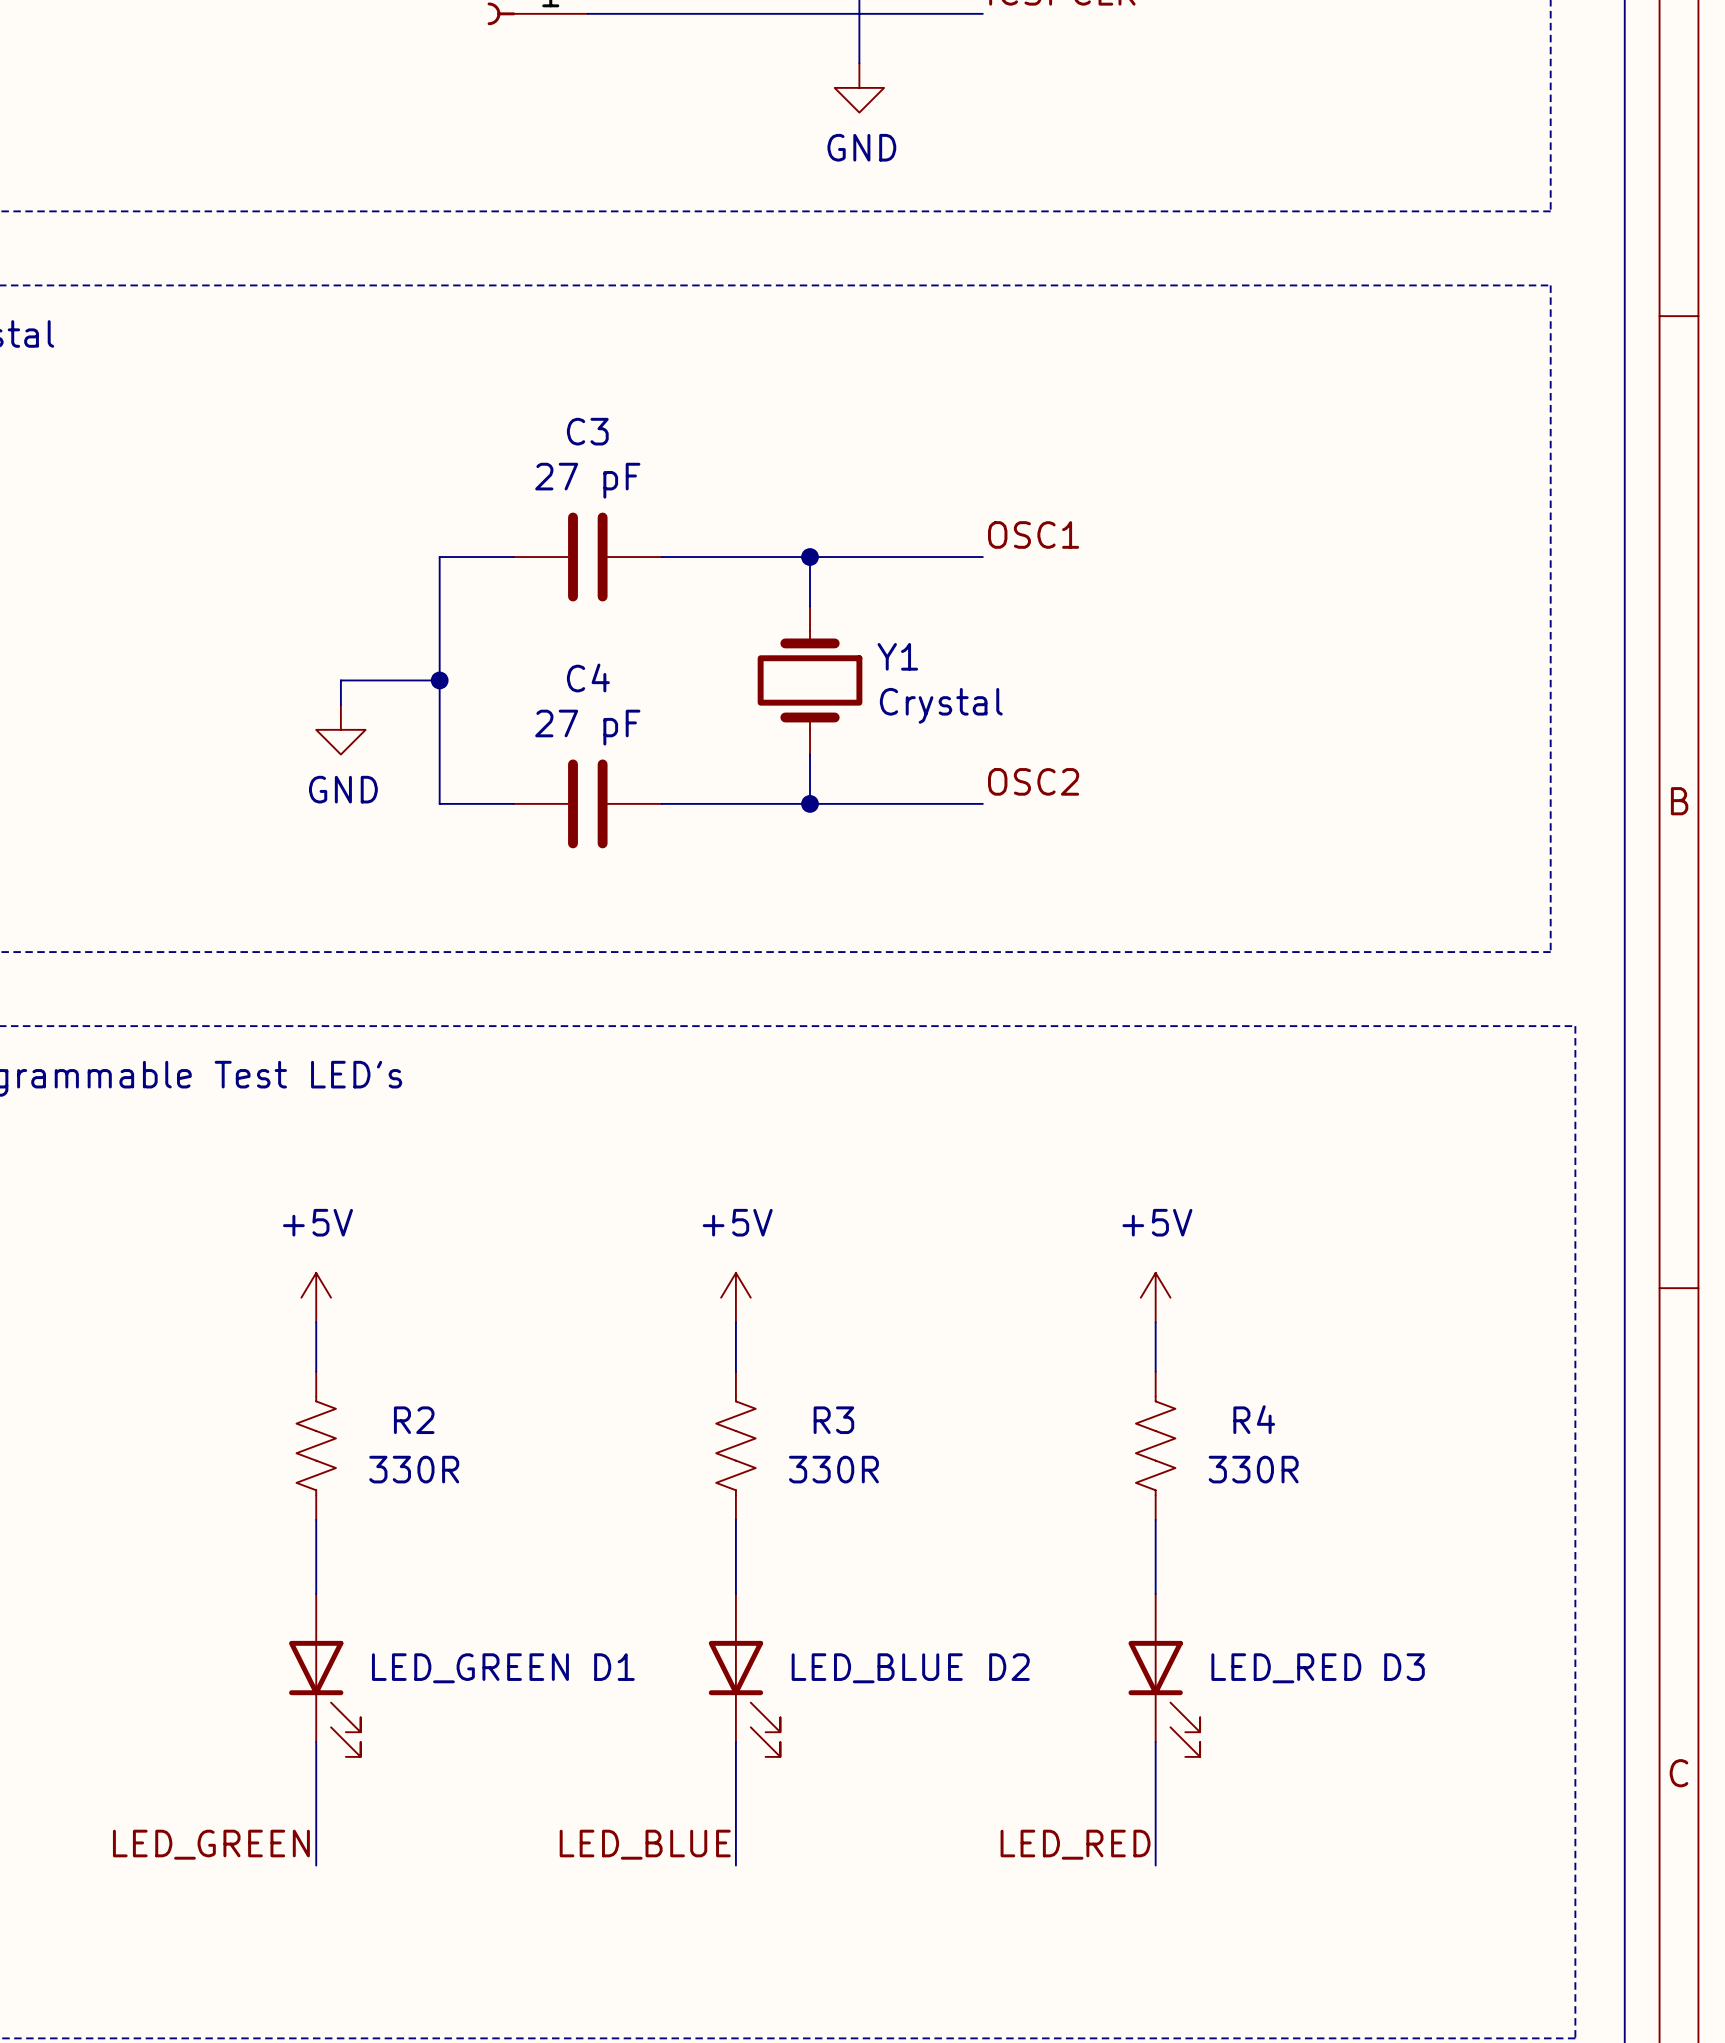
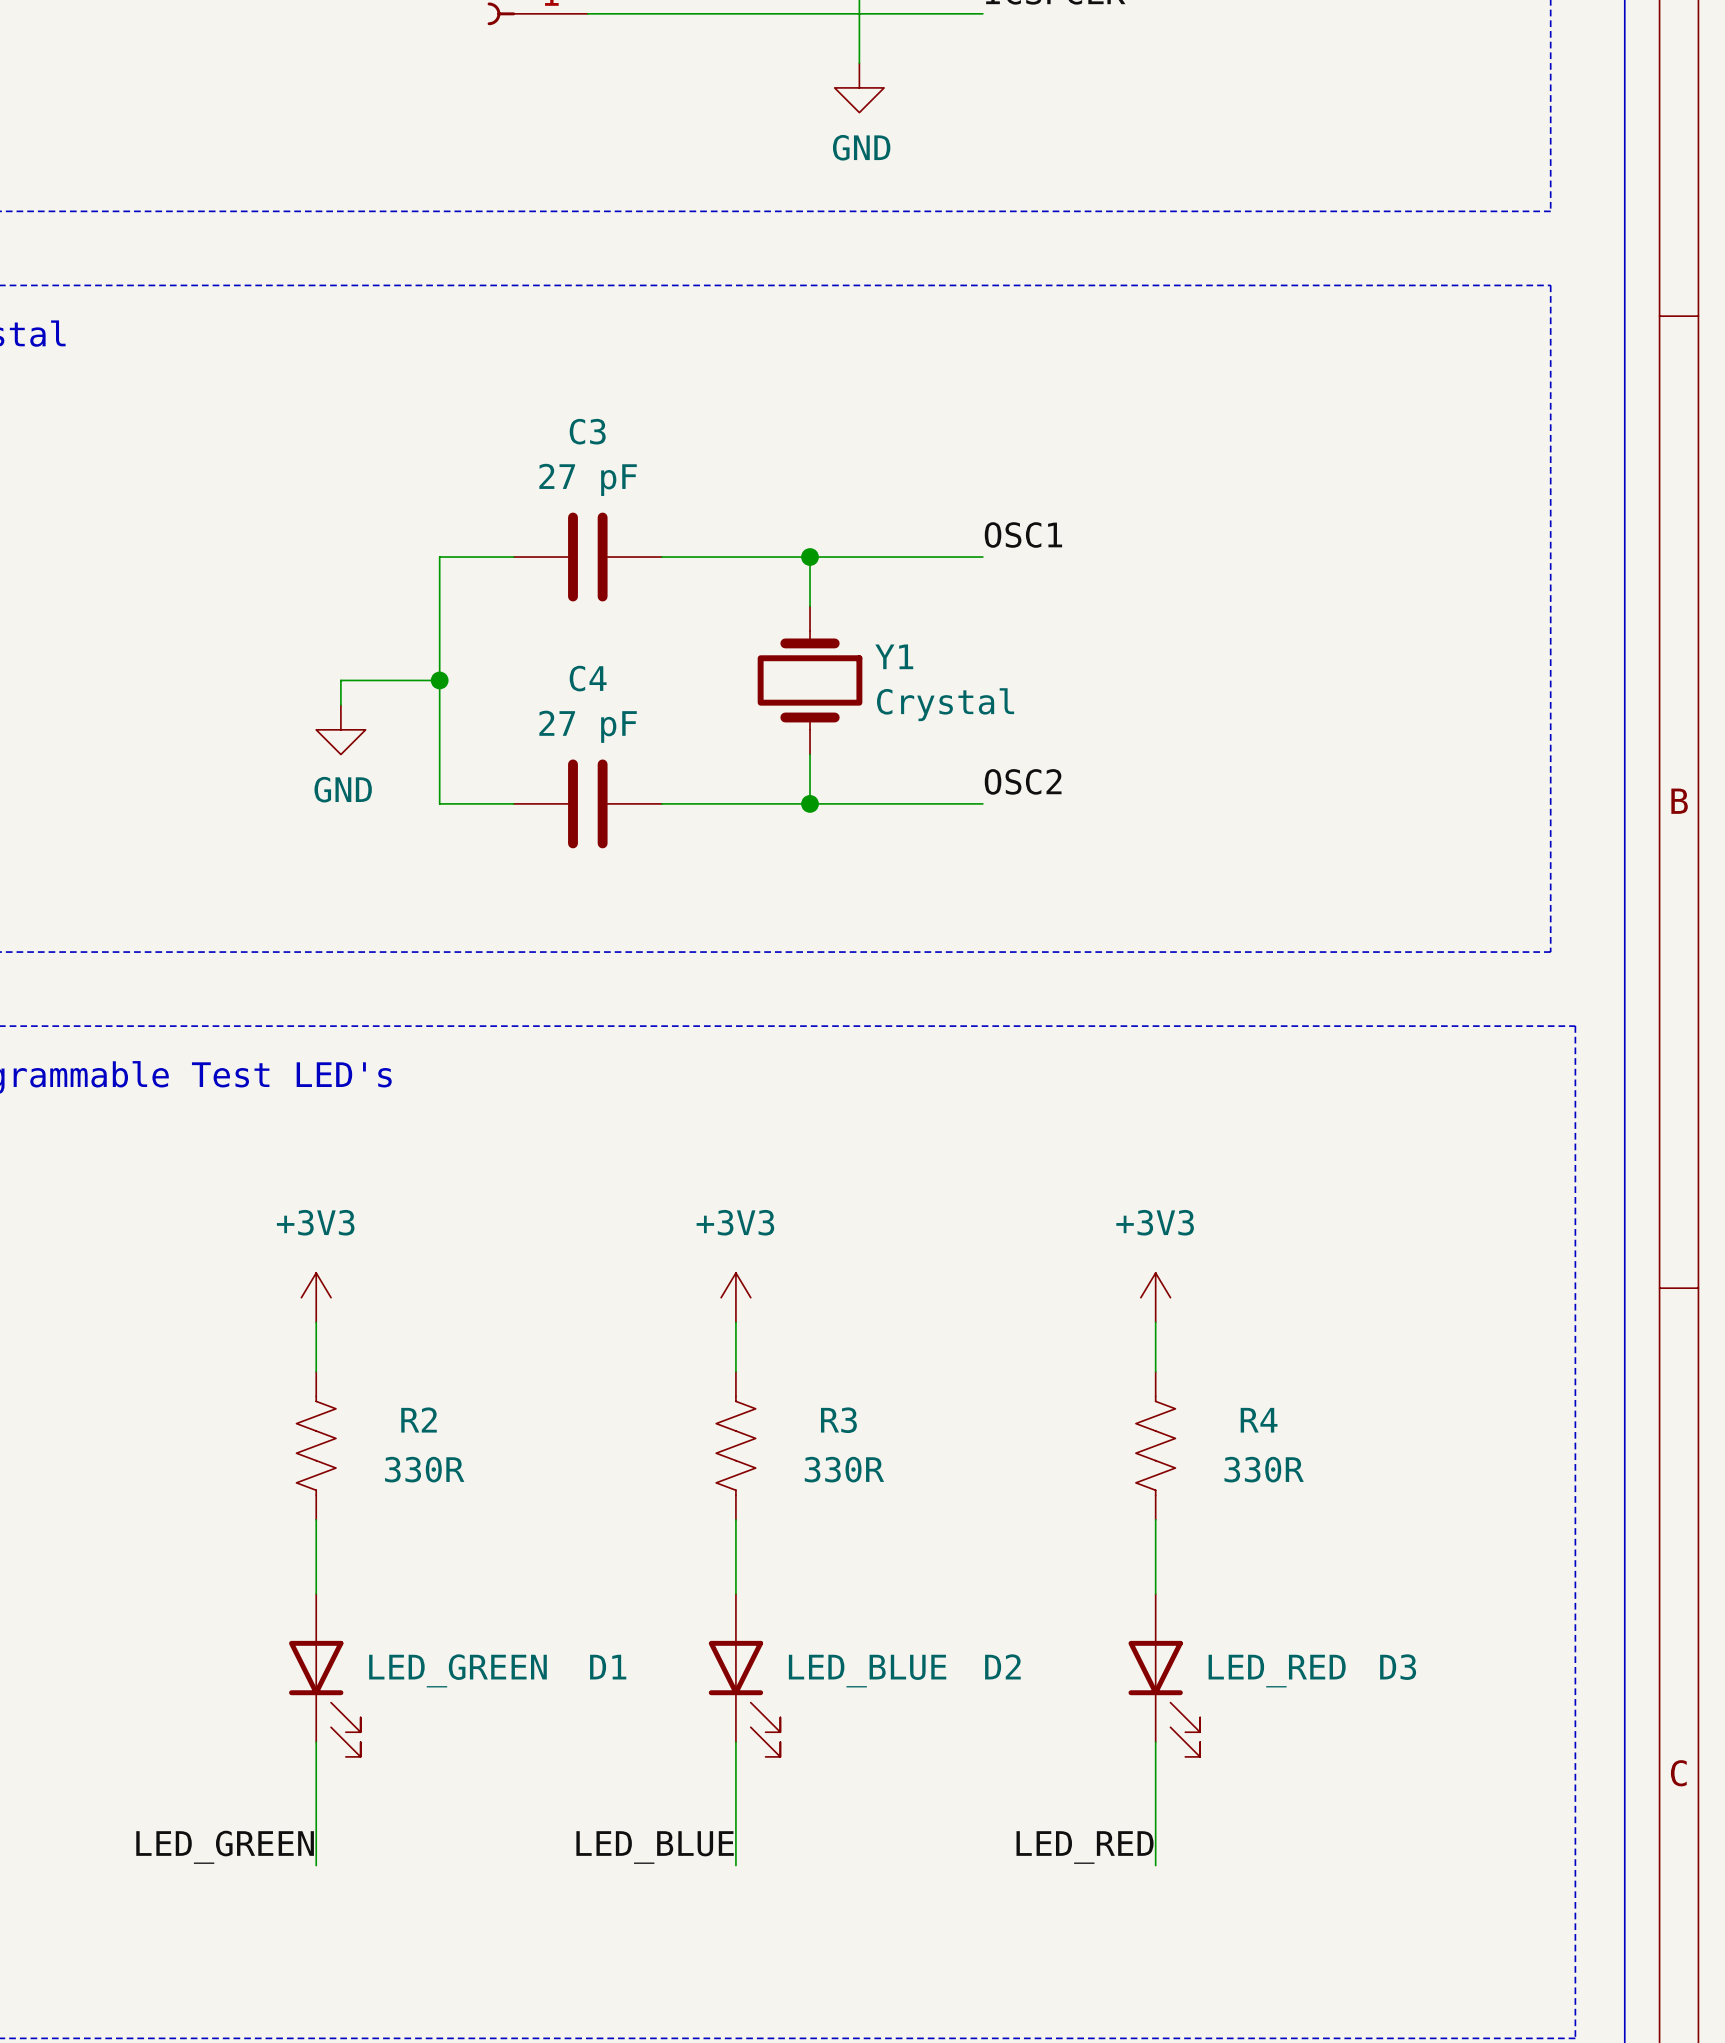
power symbol: +5V (316, 1297) -> +3V3 (316, 1297)
power symbol: +5V (735, 1297) -> +3V3 (735, 1297)
power symbol: +5V (1155, 1297) -> +3V3 (1155, 1297)

